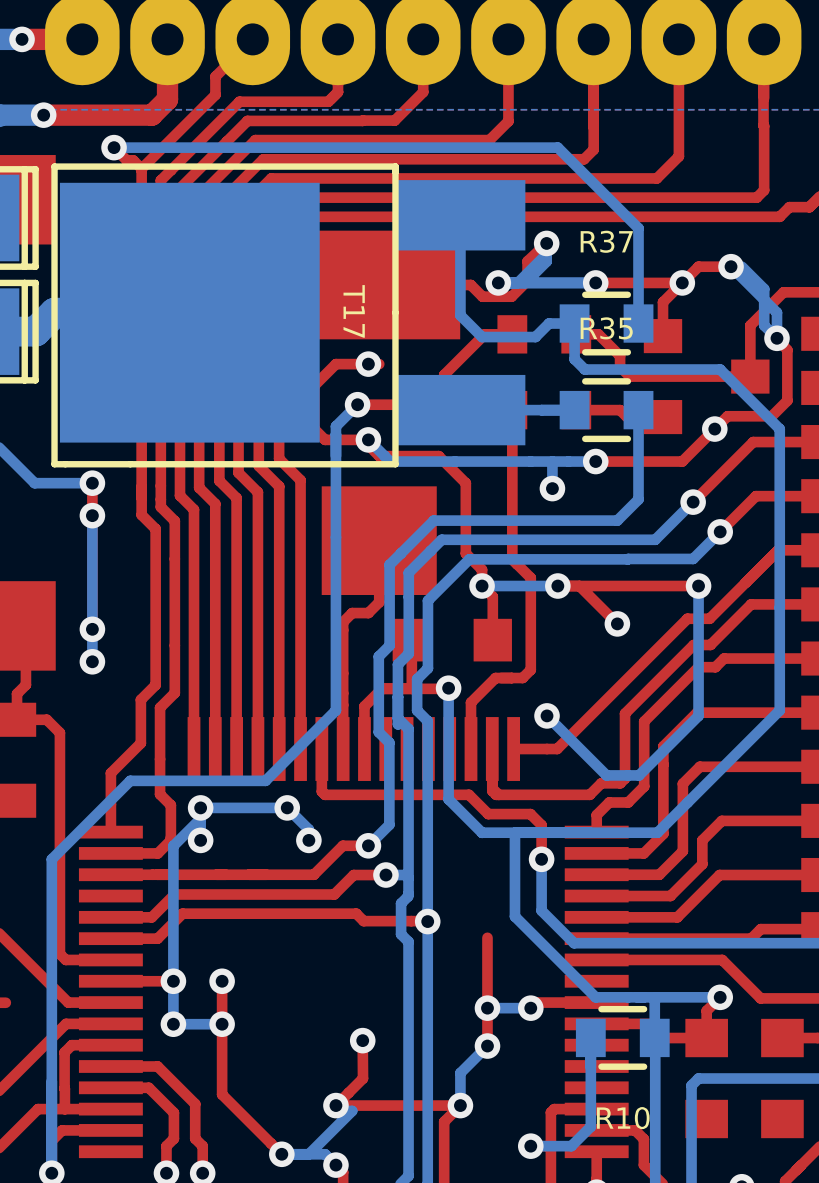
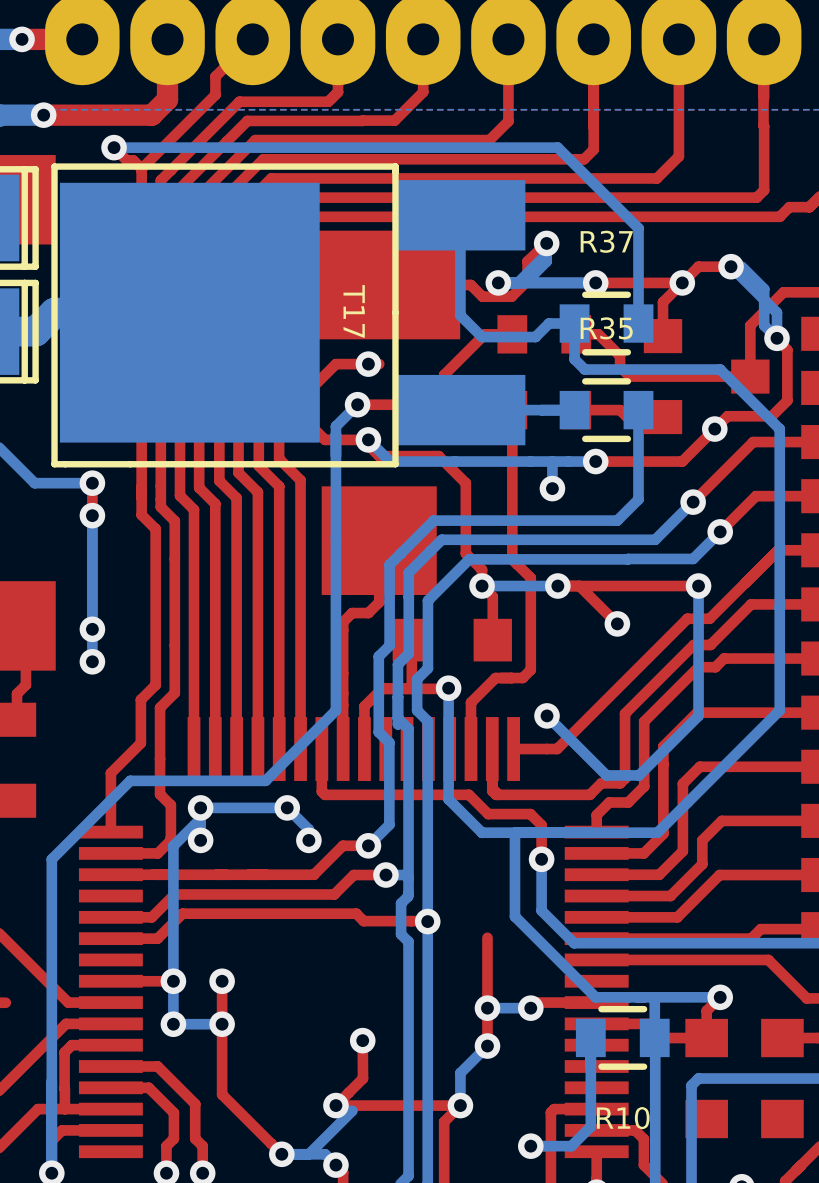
top track: (17, 719) (46, 719) (59, 732) (59, 954) (65, 959) (110, 959) -> none
top track: (722, 959) (760, 998) (806, 998) -> (722, 959) (768, 959) (806, 998)

